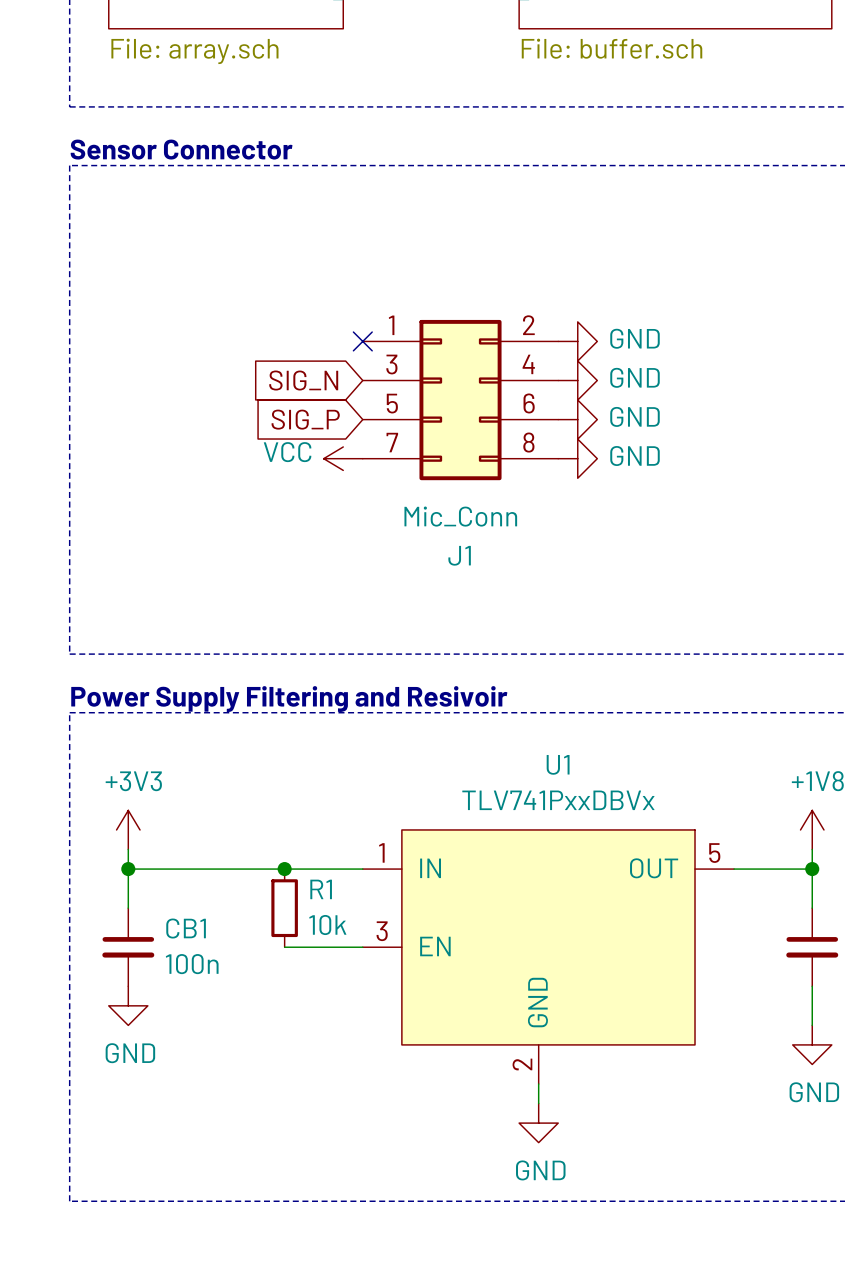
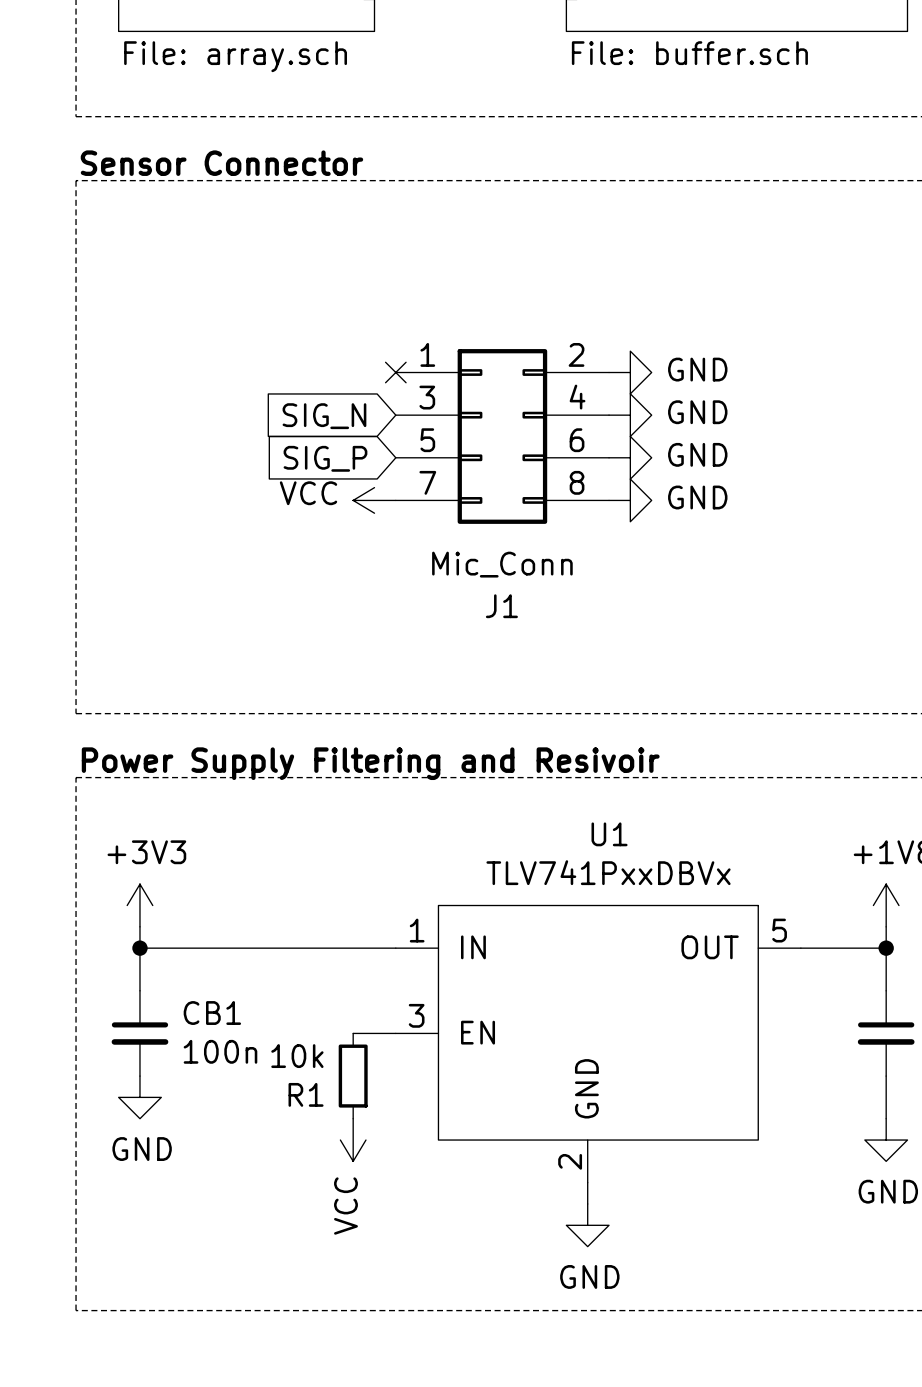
junction: (284, 869) -> none
R1 name position: R1 (321, 889) -> R1 (306, 1094)
R1 position: (284, 908) -> (353, 1076)
R1 value position: 10k (327, 925) -> 10k (297, 1056)
wire: (284, 947) (323, 947) -> none
power symbol: none -> VCC (353, 1140)

